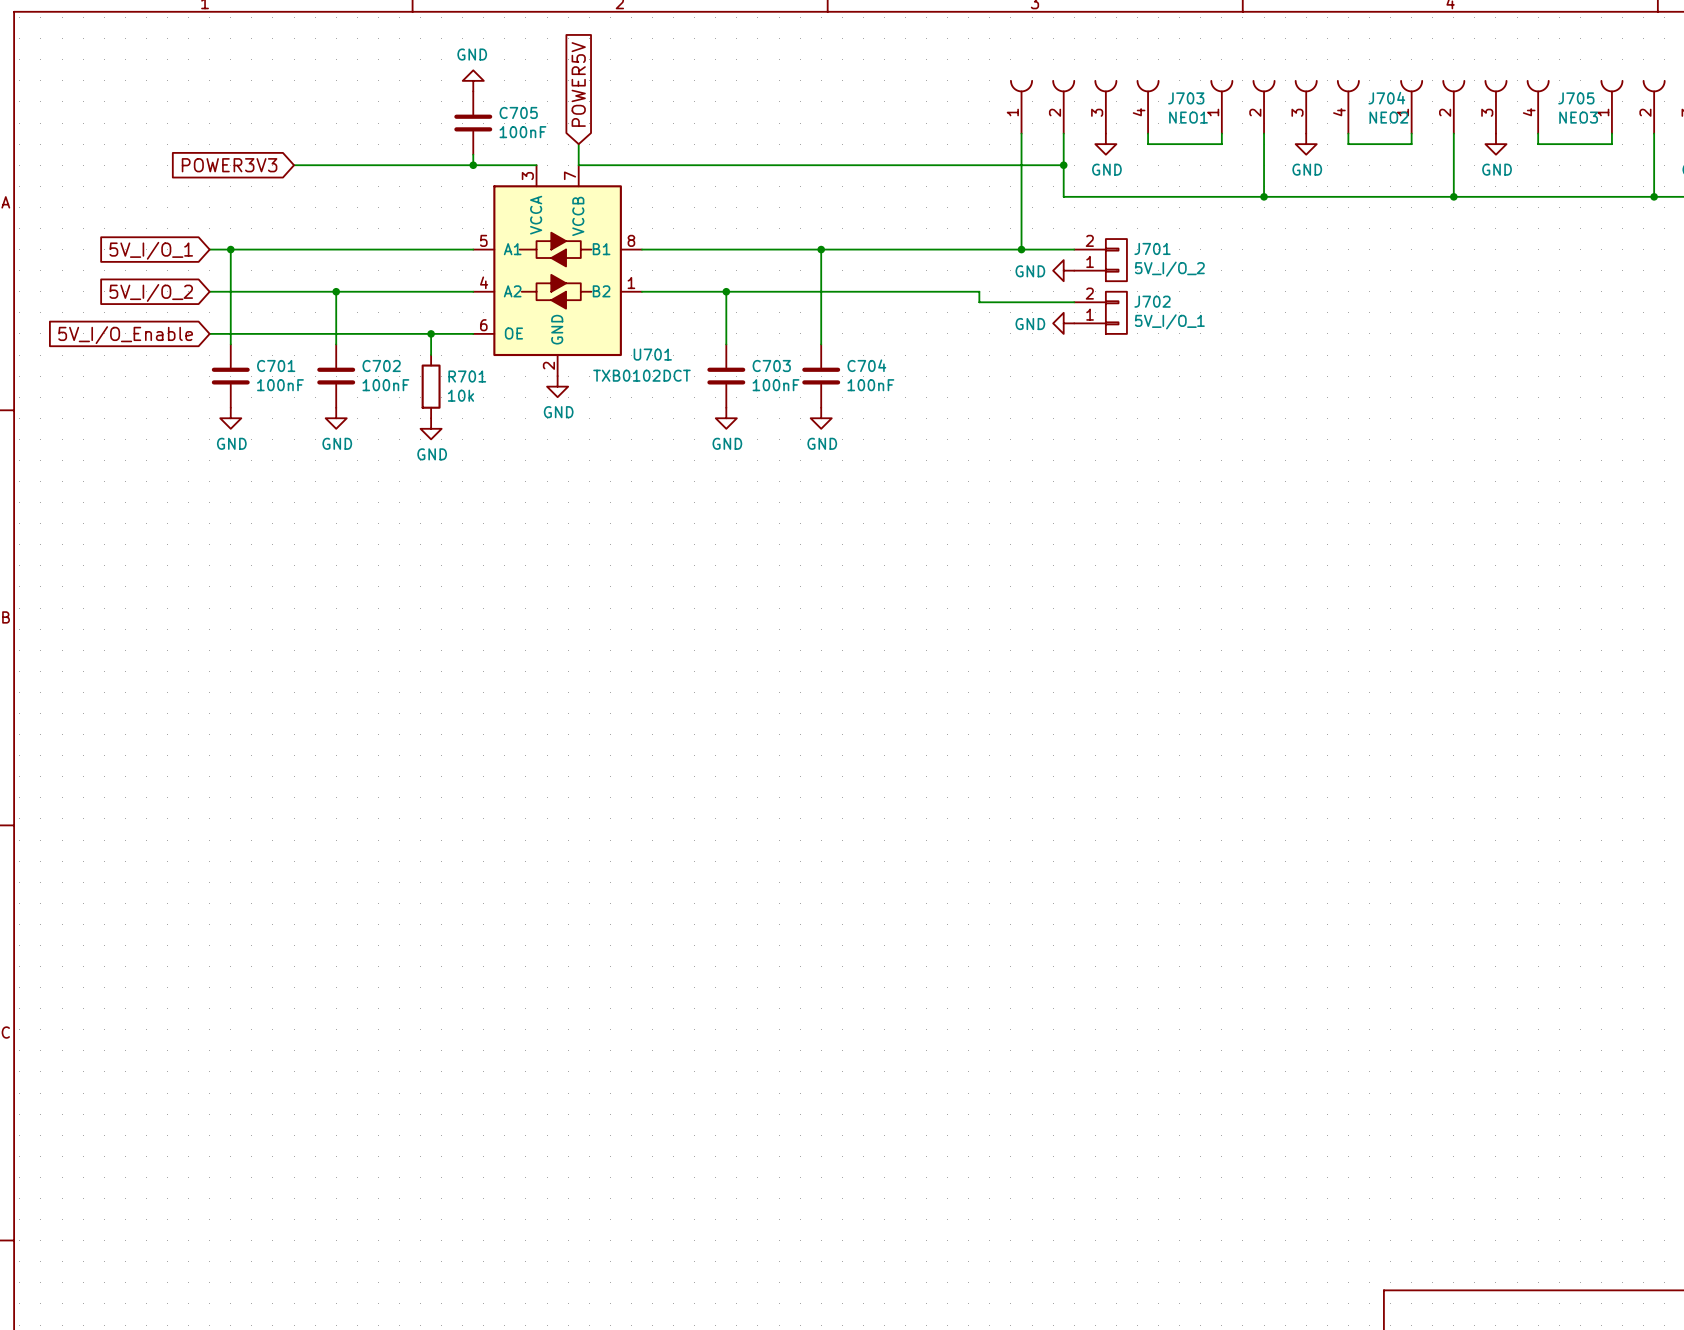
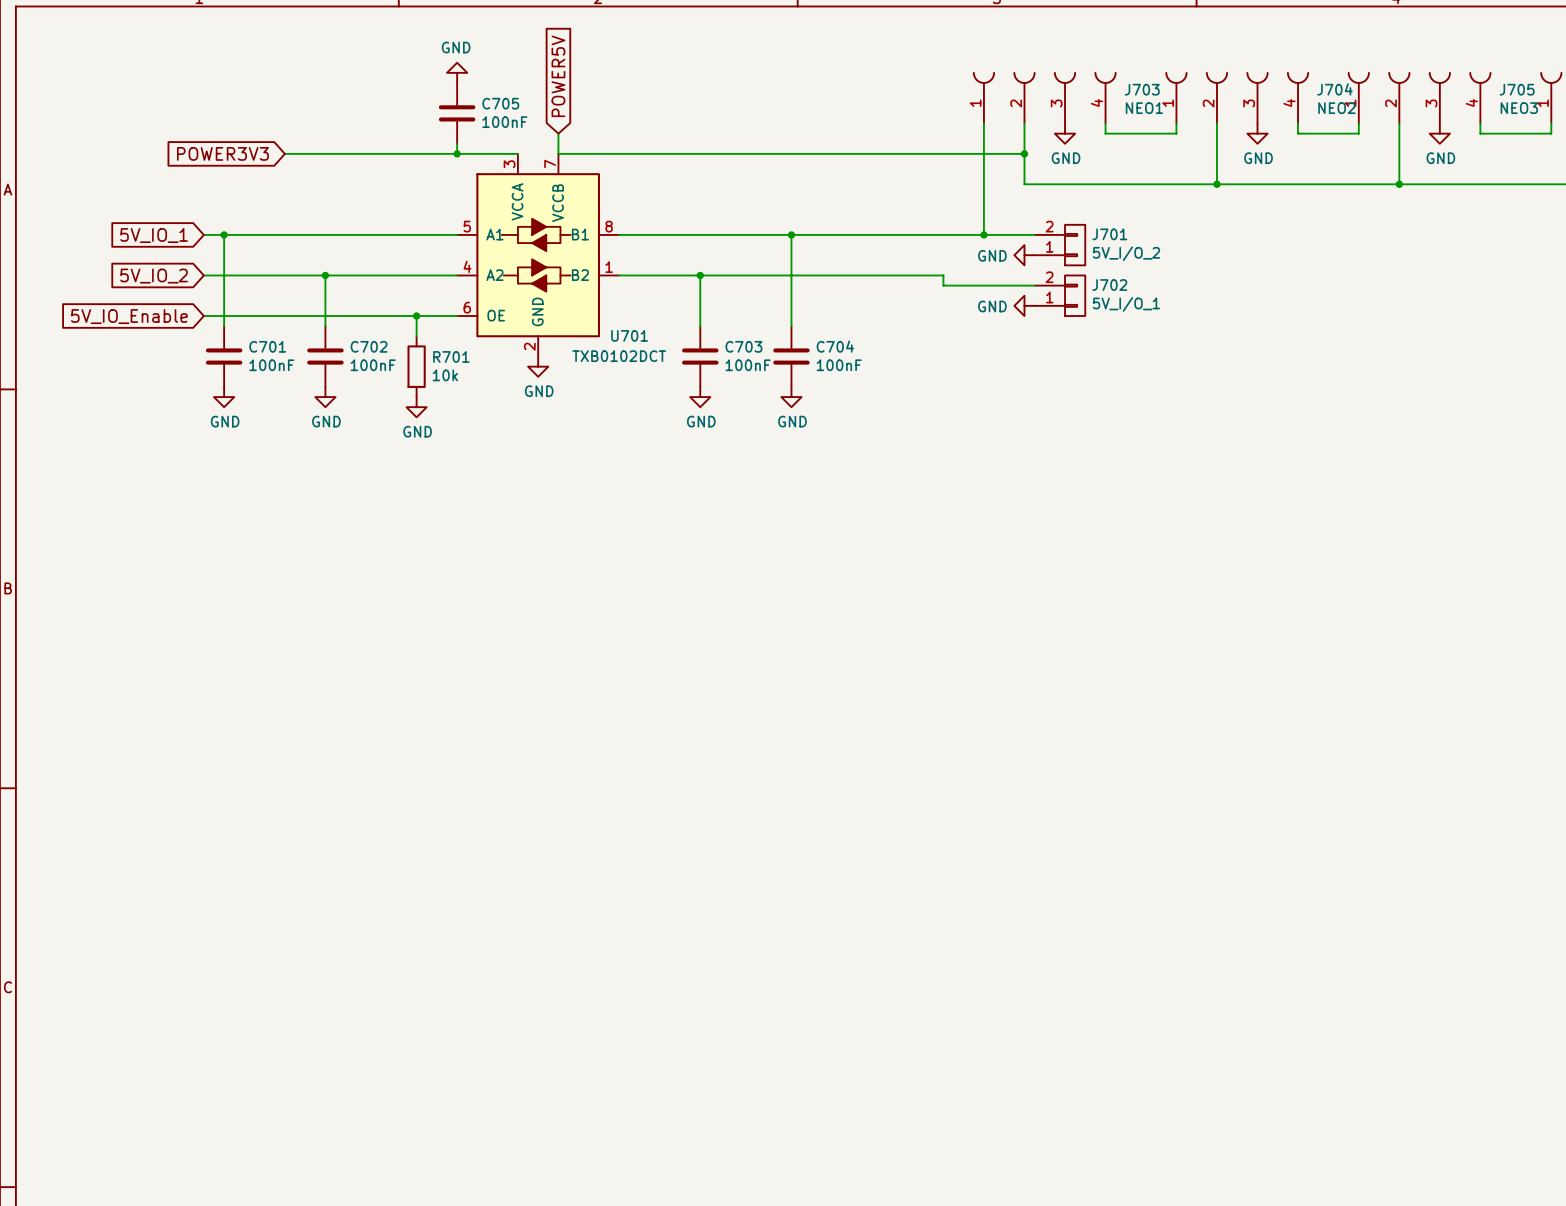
global label: 5V_I/O_1 (151, 250) -> 5V_IO_1 (154, 235)
global label: 5V_I/O_2 (151, 292) -> 5V_IO_2 (154, 276)
global label: 5V_I/O_Enable (125, 335) -> 5V_IO_Enable (129, 316)

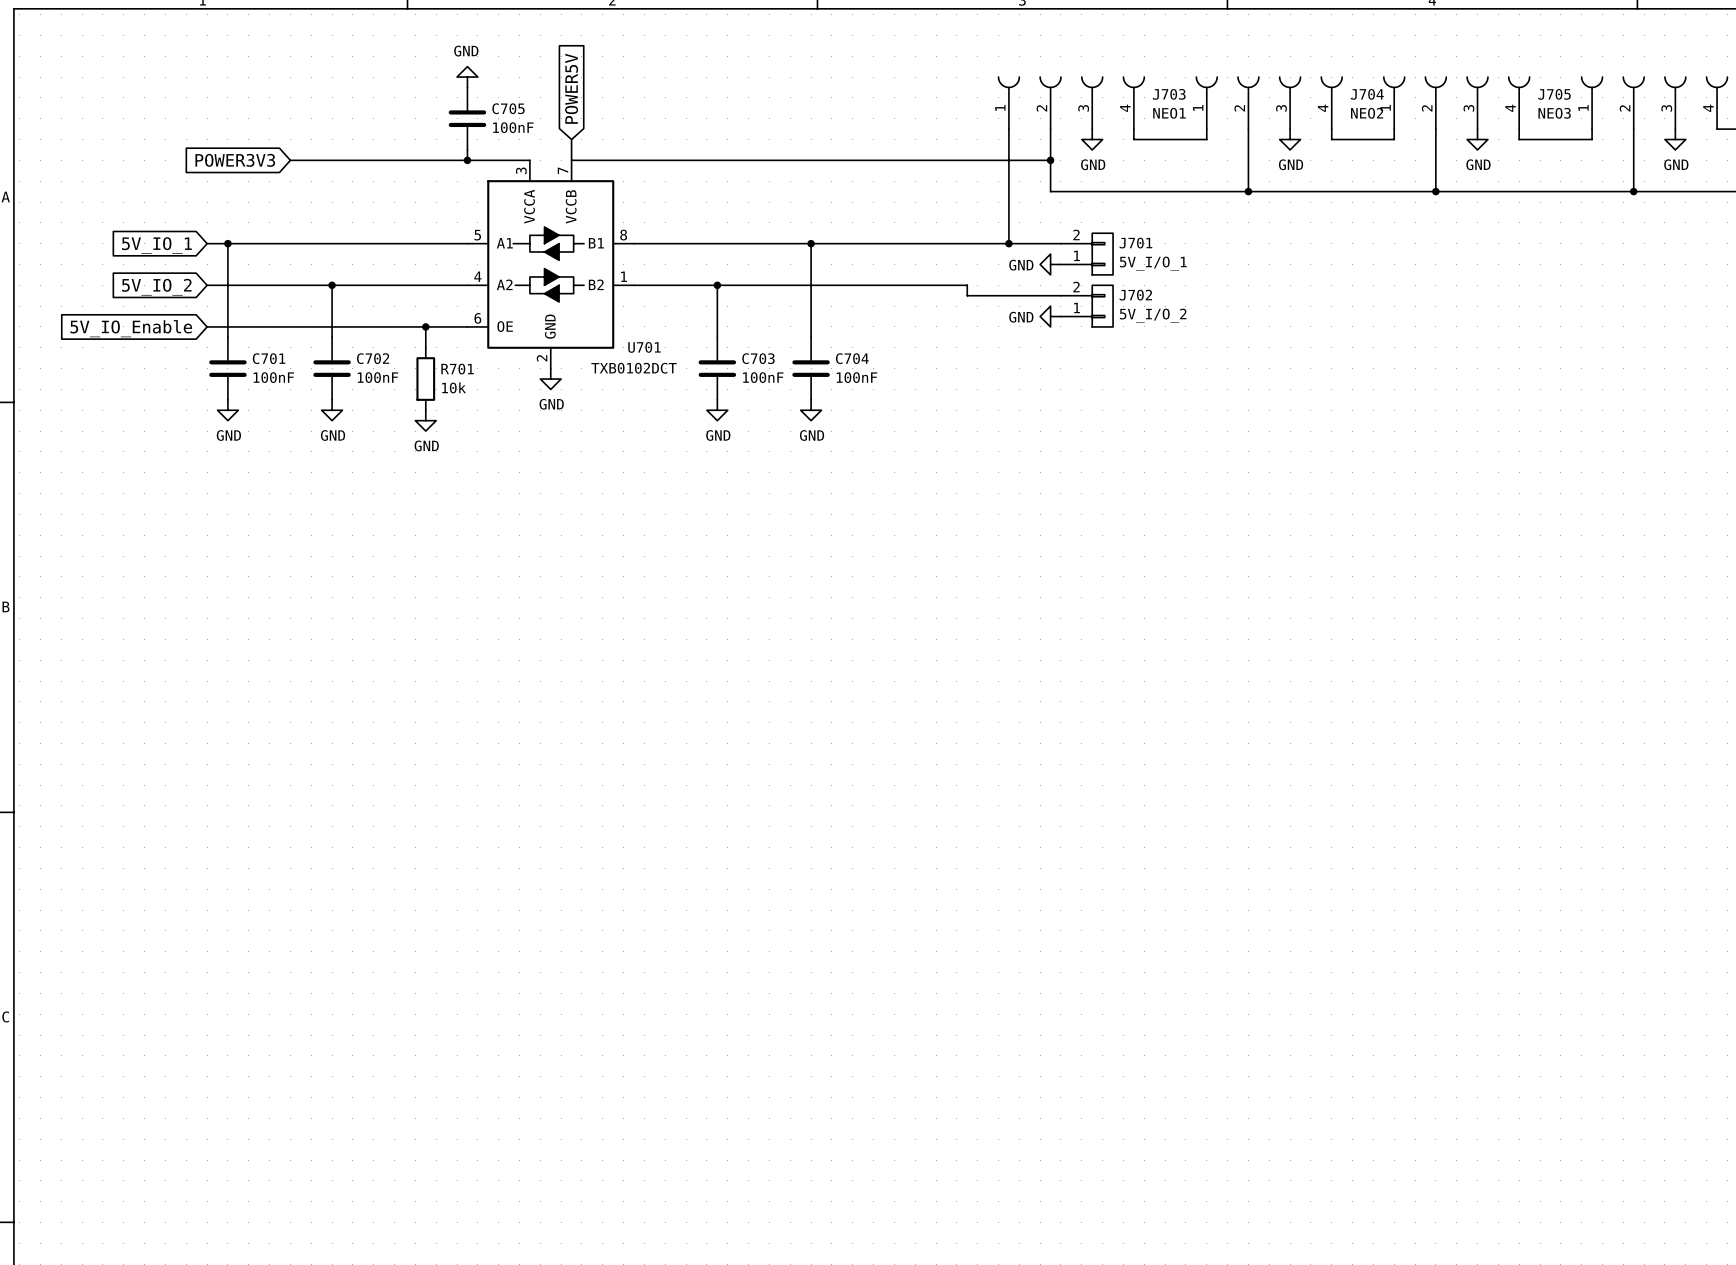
J701 value: 5V_I/O_2 (1126, 253) -> 5V_I/O_1 (1153, 263)
J702 value: 5V_I/O_1 (1126, 304) -> 5V_I/O_2 (1153, 315)

